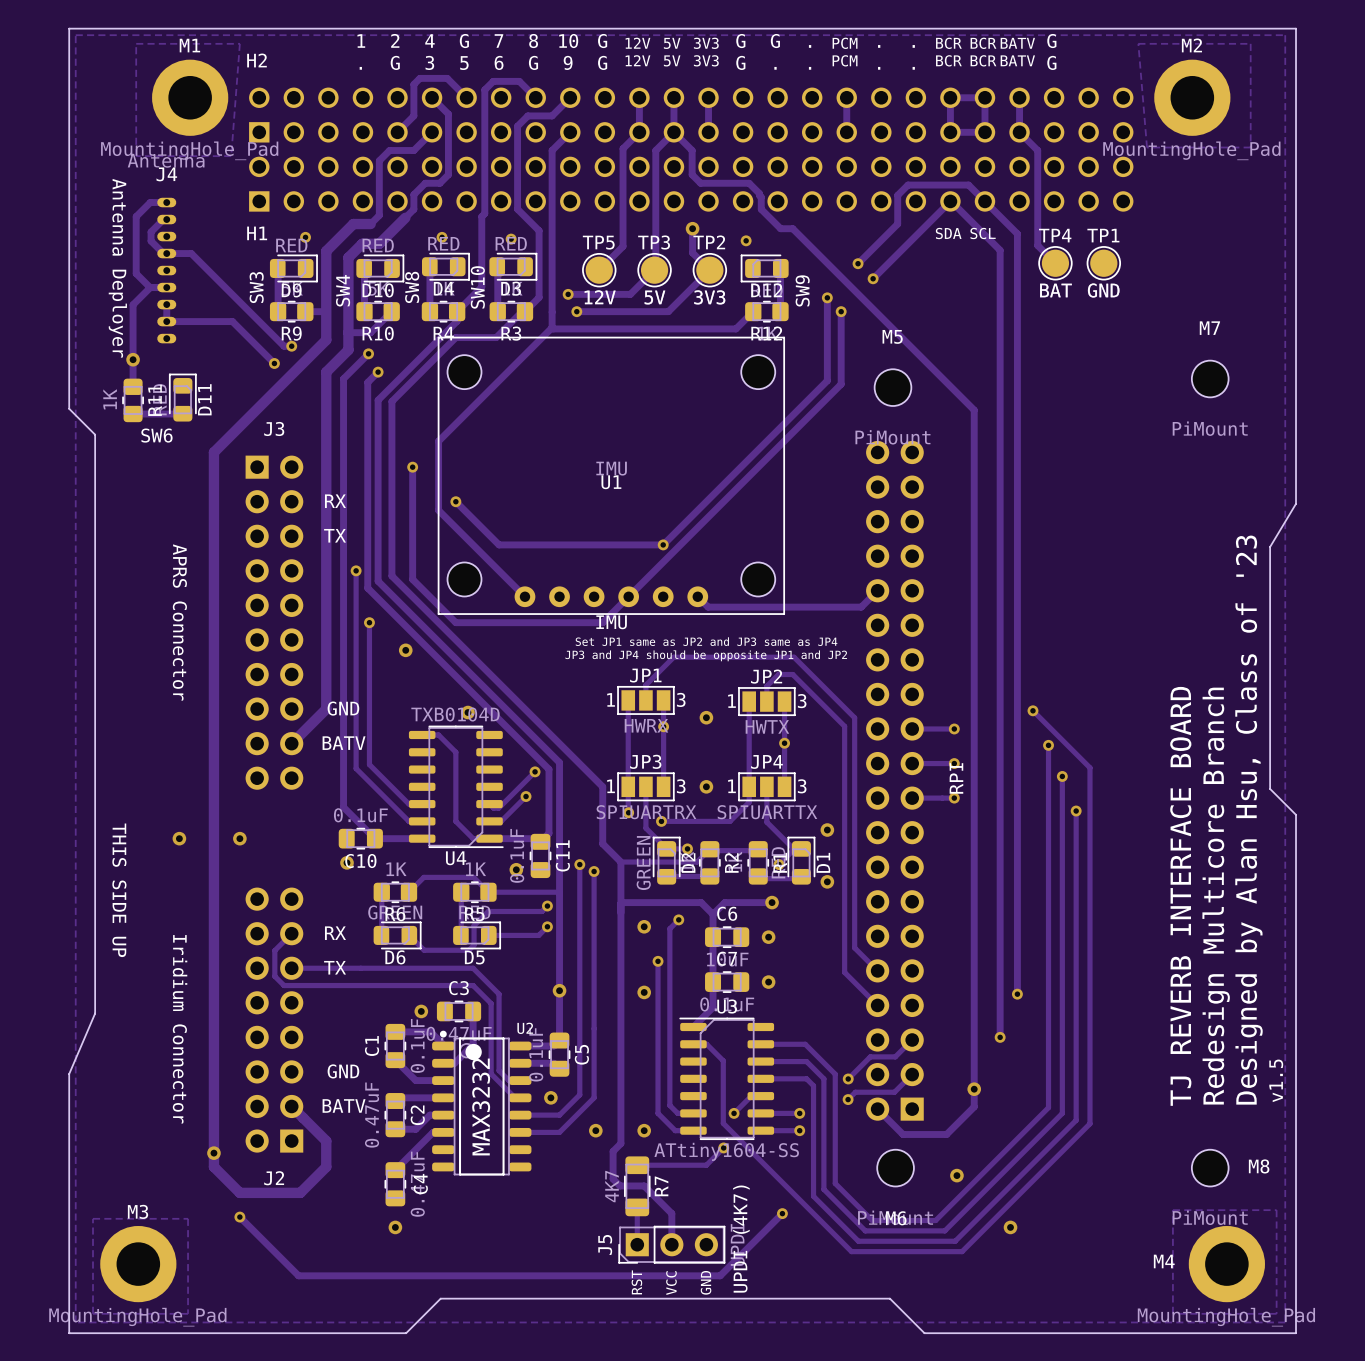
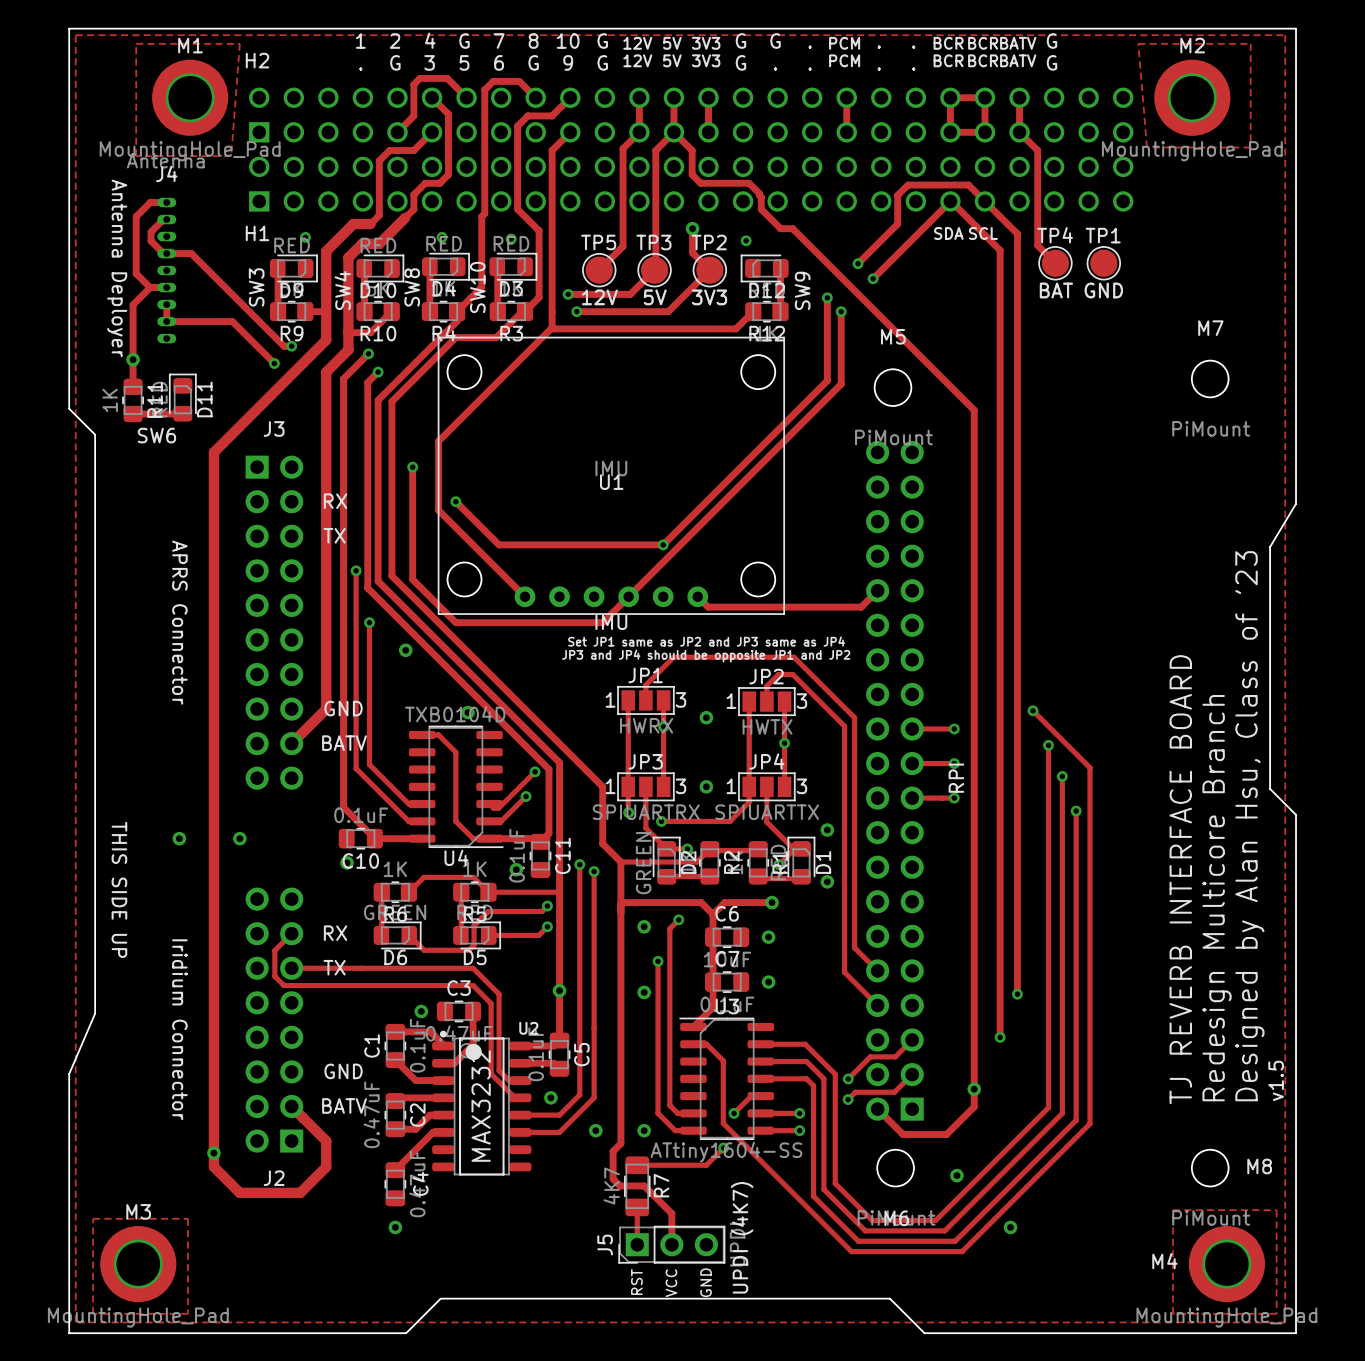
track: (782, 1213) (720, 1275) (298, 1275) (239, 1217) -> none
via: (782, 1213) -> none
via: (239, 1217) -> none

